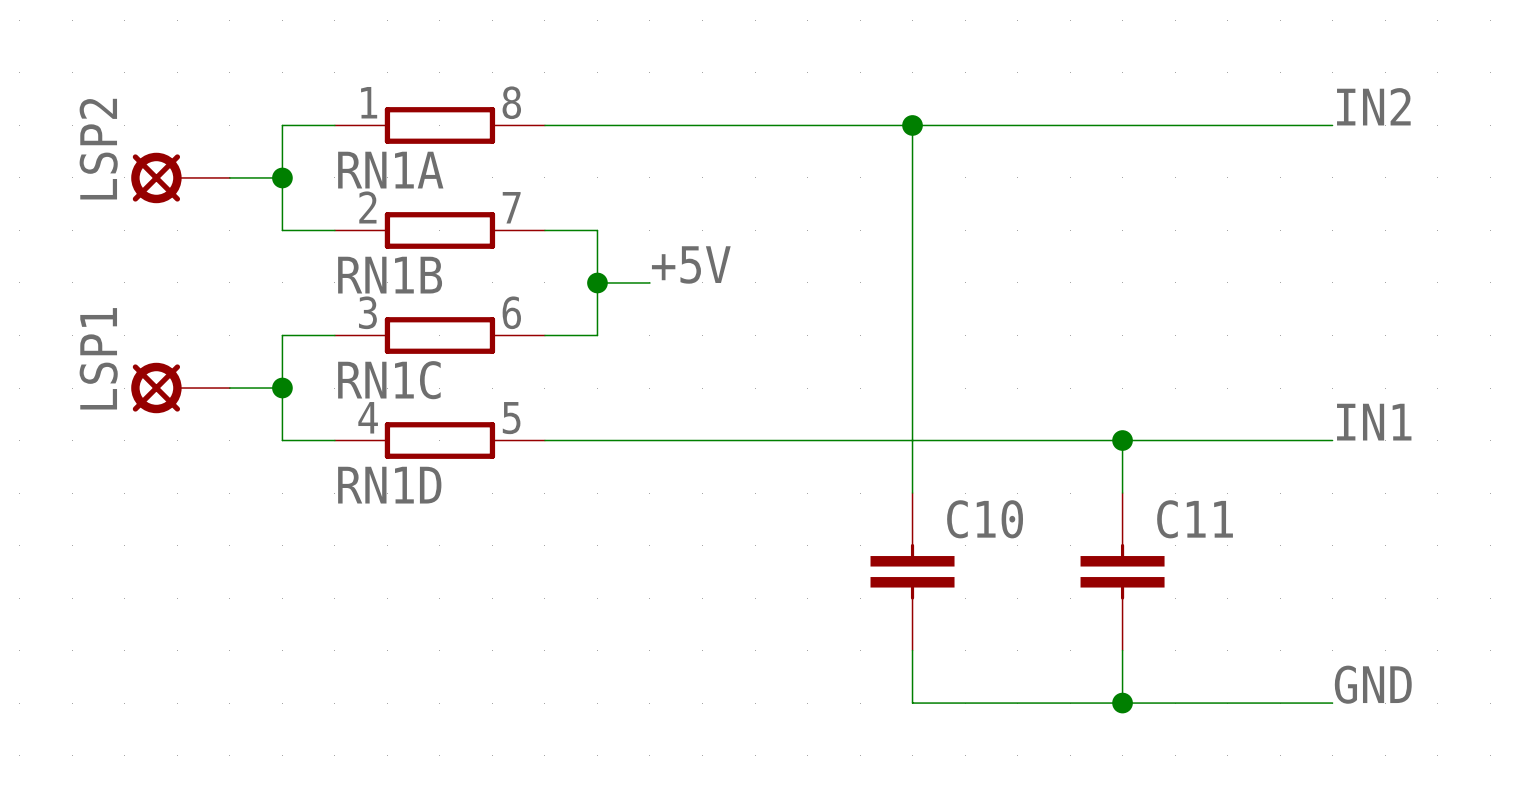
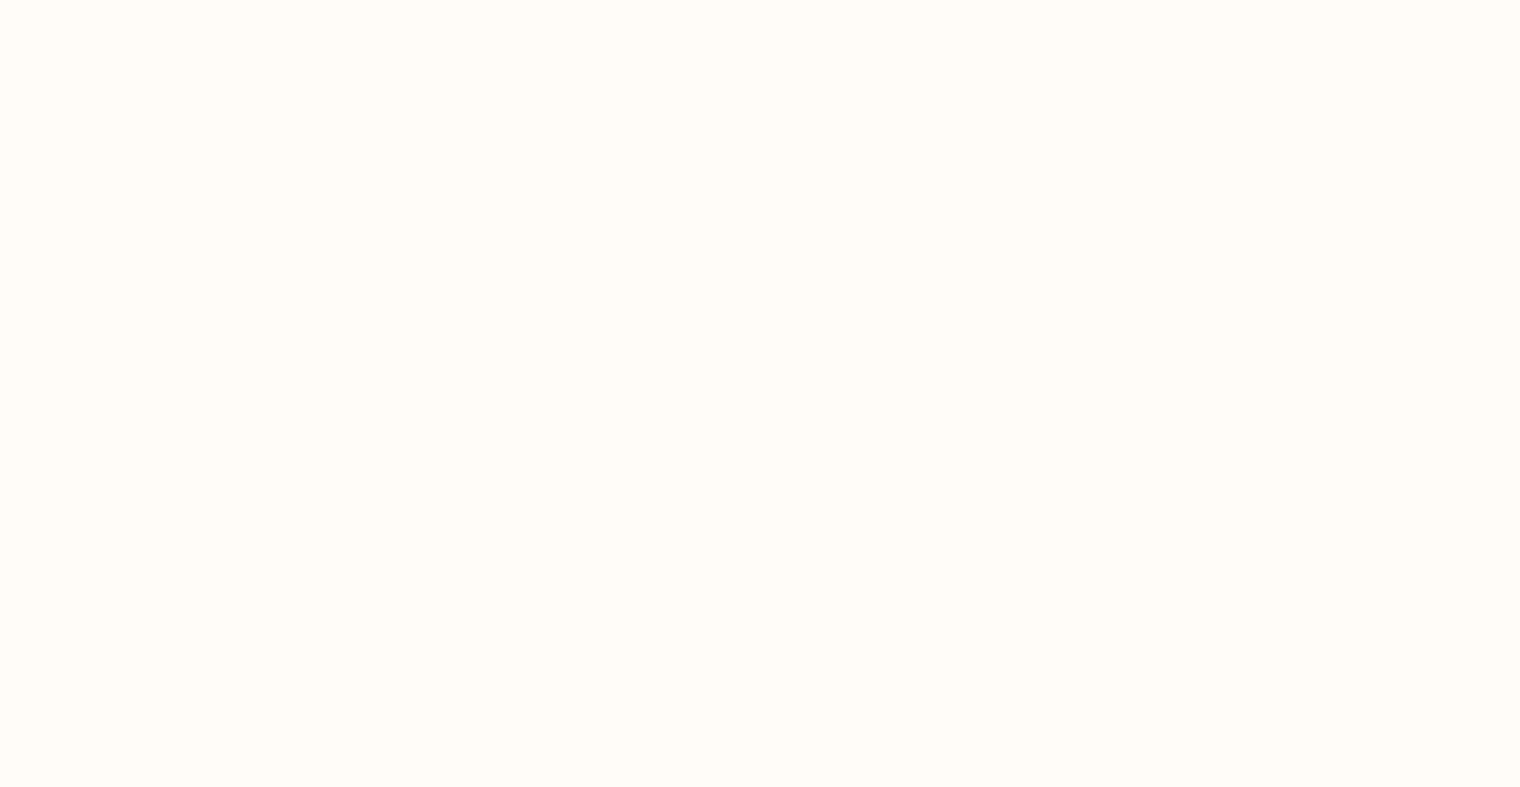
label: IN2 (1373, 106) -> none
wire: (334, 125) (282, 125) (282, 230) (334, 230) -> none
RN1A: (439, 125) -> none
wire: (544, 125) (1332, 125) -> none
wire: (912, 125) (912, 493) -> none
junction: (912, 125) -> none
LSP2: (180, 177) -> none
wire: (229, 177) (282, 177) -> none
junction: (282, 177) -> none
RN1B: (439, 230) -> none
wire: (544, 230) (597, 230) (597, 335) (544, 335) -> none
label: +5V (691, 264) -> none
wire: (597, 282) (649, 282) -> none
junction: (597, 282) -> none
wire: (334, 335) (282, 335) (282, 440) (334, 440) -> none
RN1C: (439, 335) -> none
LSP1: (180, 388) -> none
wire: (229, 388) (282, 388) -> none
junction: (282, 388) -> none
label: IN1 (1374, 422) -> none
RN1D: (439, 440) -> none
wire: (544, 440) (1332, 440) -> none
wire: (1122, 440) (1122, 493) -> none
junction: (1122, 440) -> none
C10: (912, 571) -> none
C11: (1122, 571) -> none
wire: (912, 650) (912, 703) (1332, 703) -> none
wire: (1122, 650) (1122, 703) -> none
label: GND (1373, 684) -> none
junction: (1122, 703) -> none

